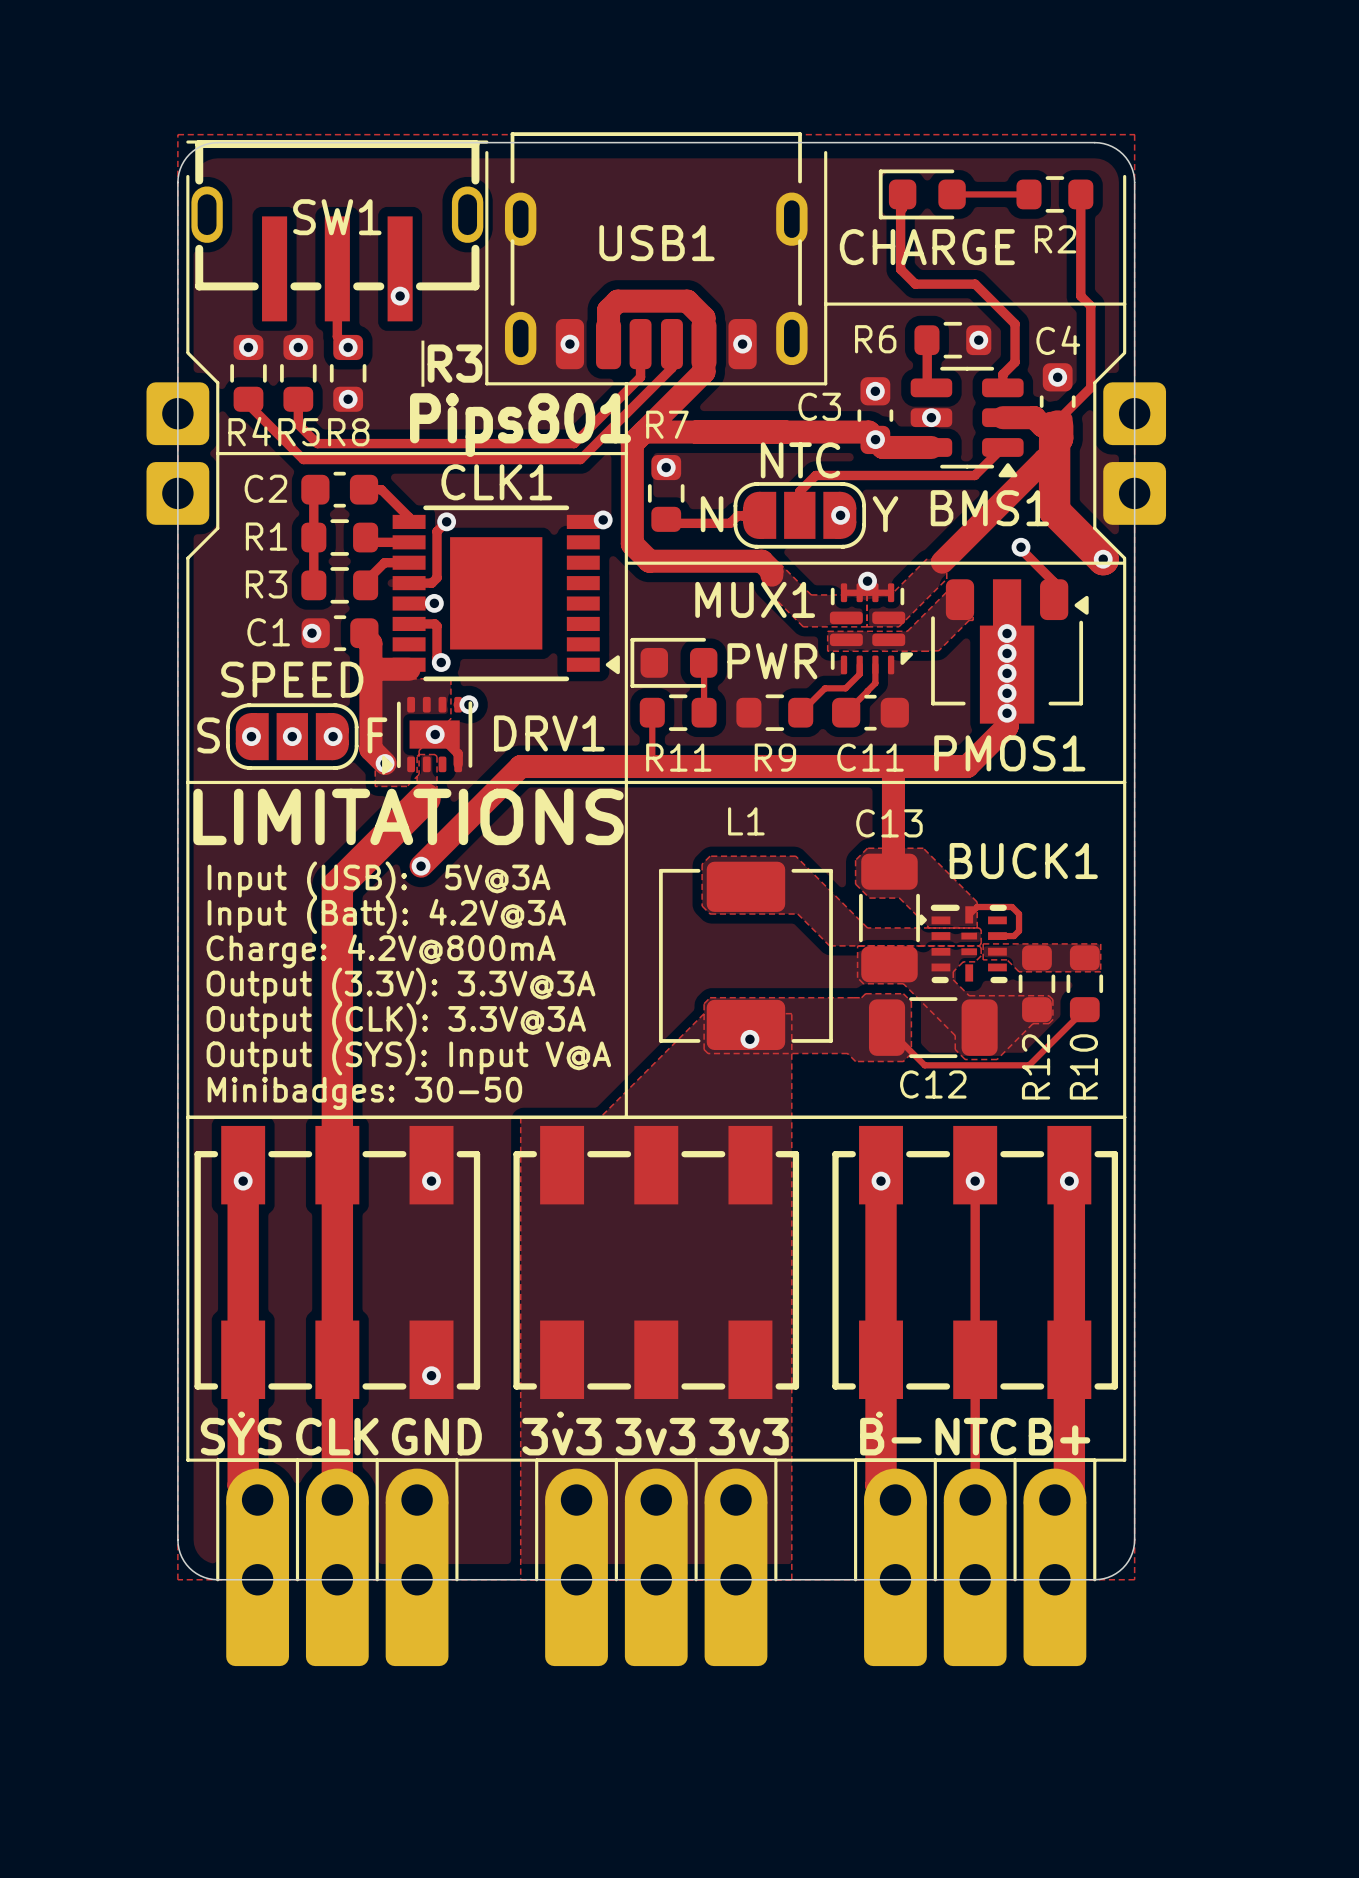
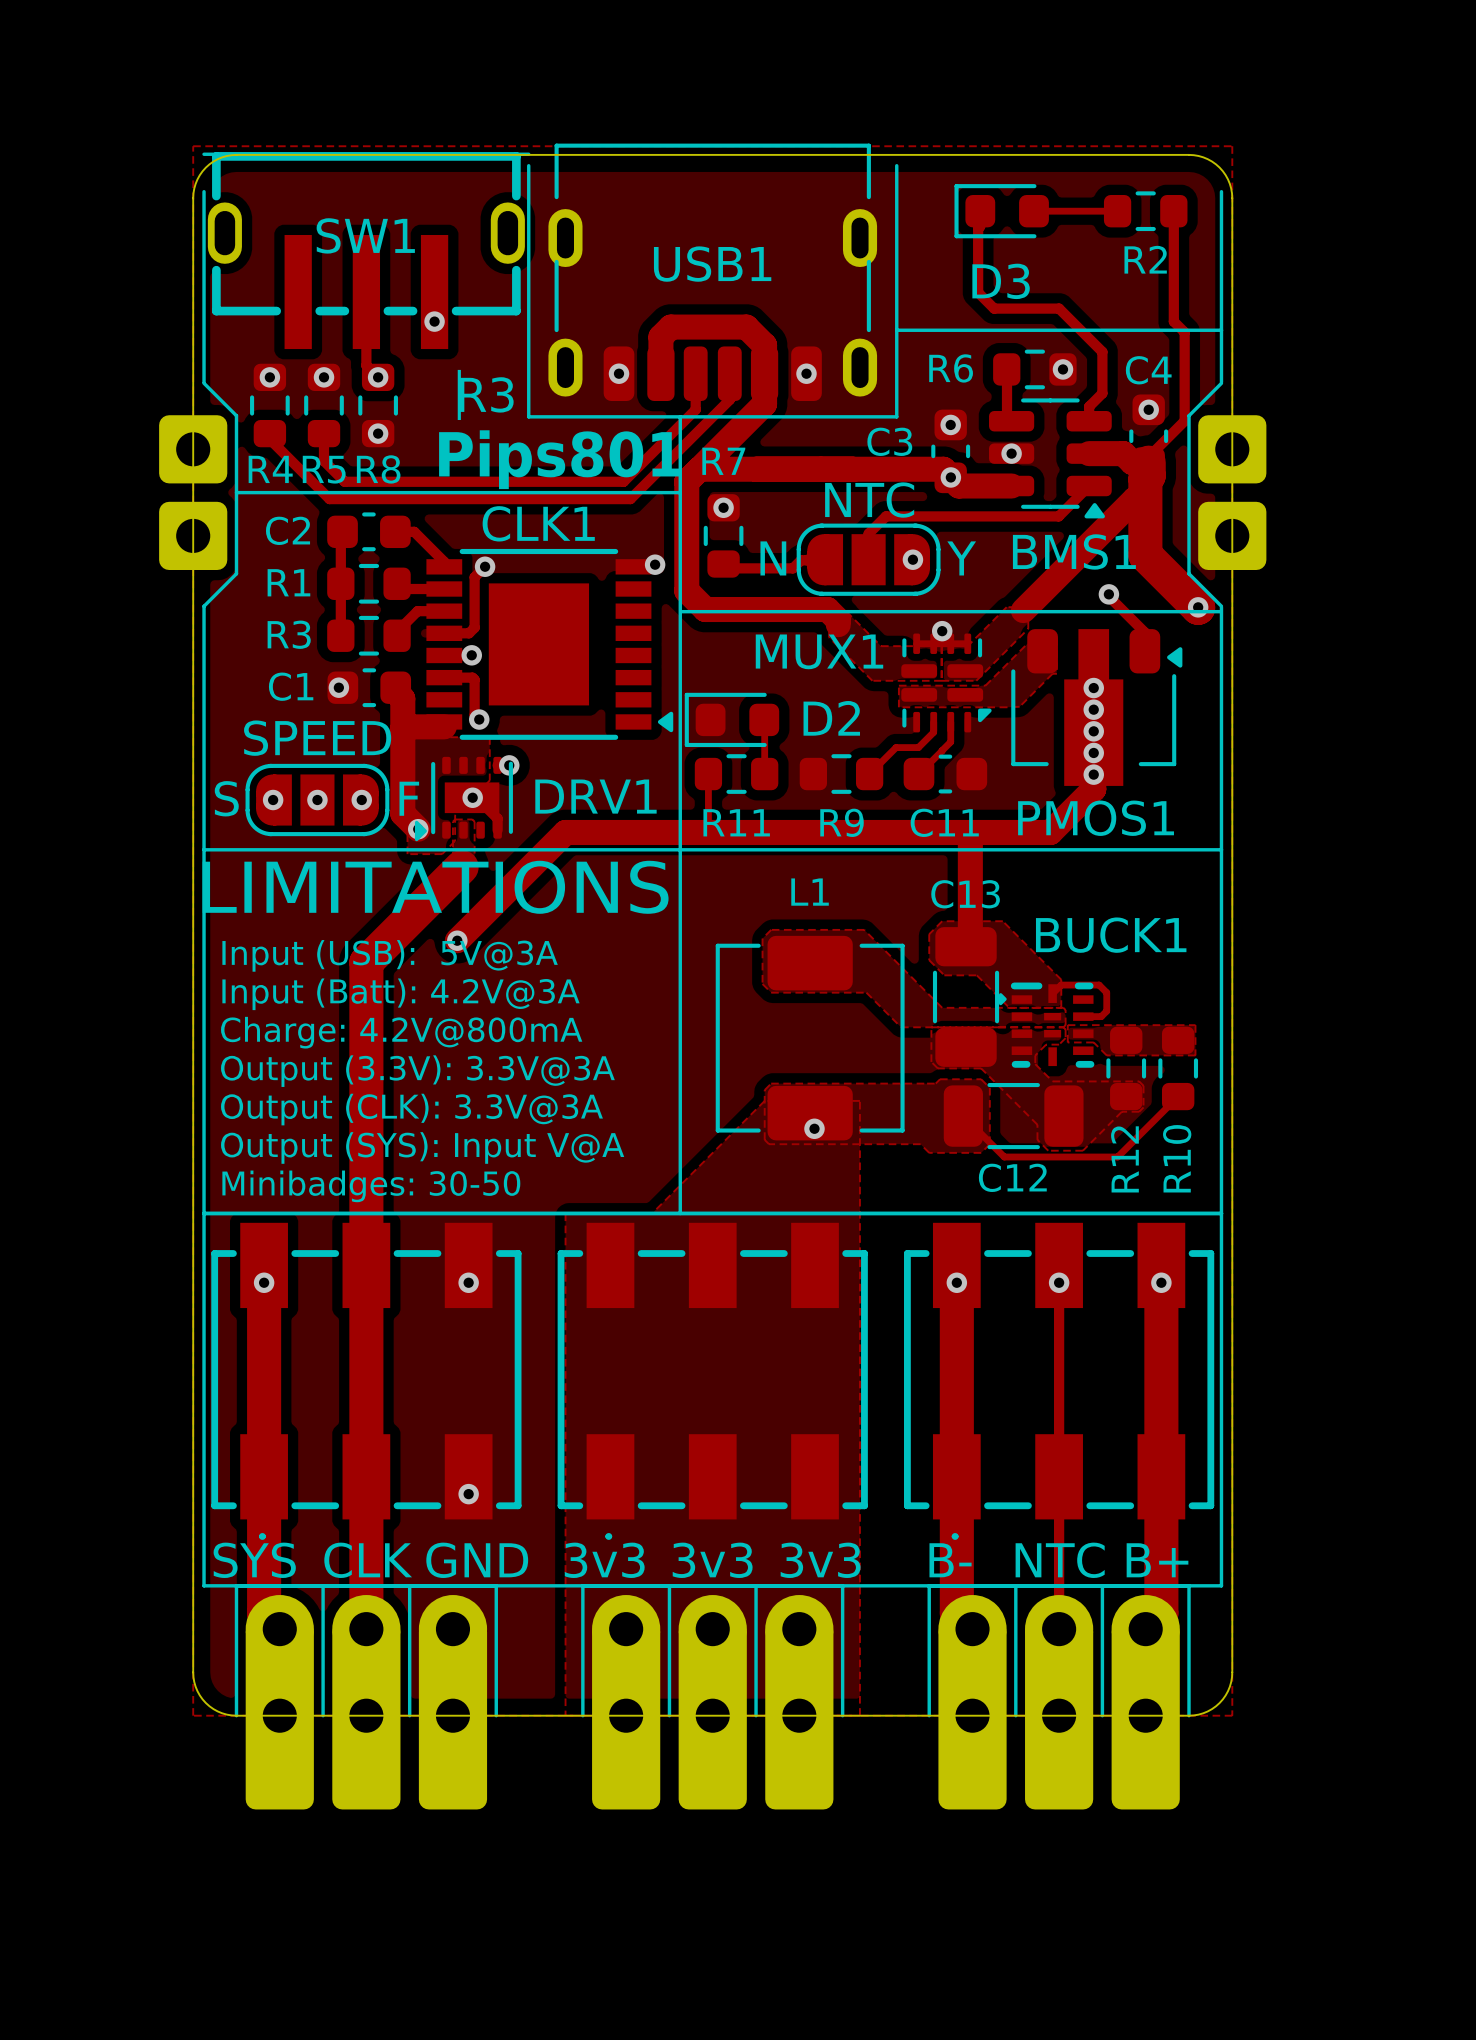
text: CHARGE (927, 247) -> none
D3 name: none -> D3 (1001, 281)
D2 name: none -> D2 (831, 718)
text: PWR (772, 661) -> none

